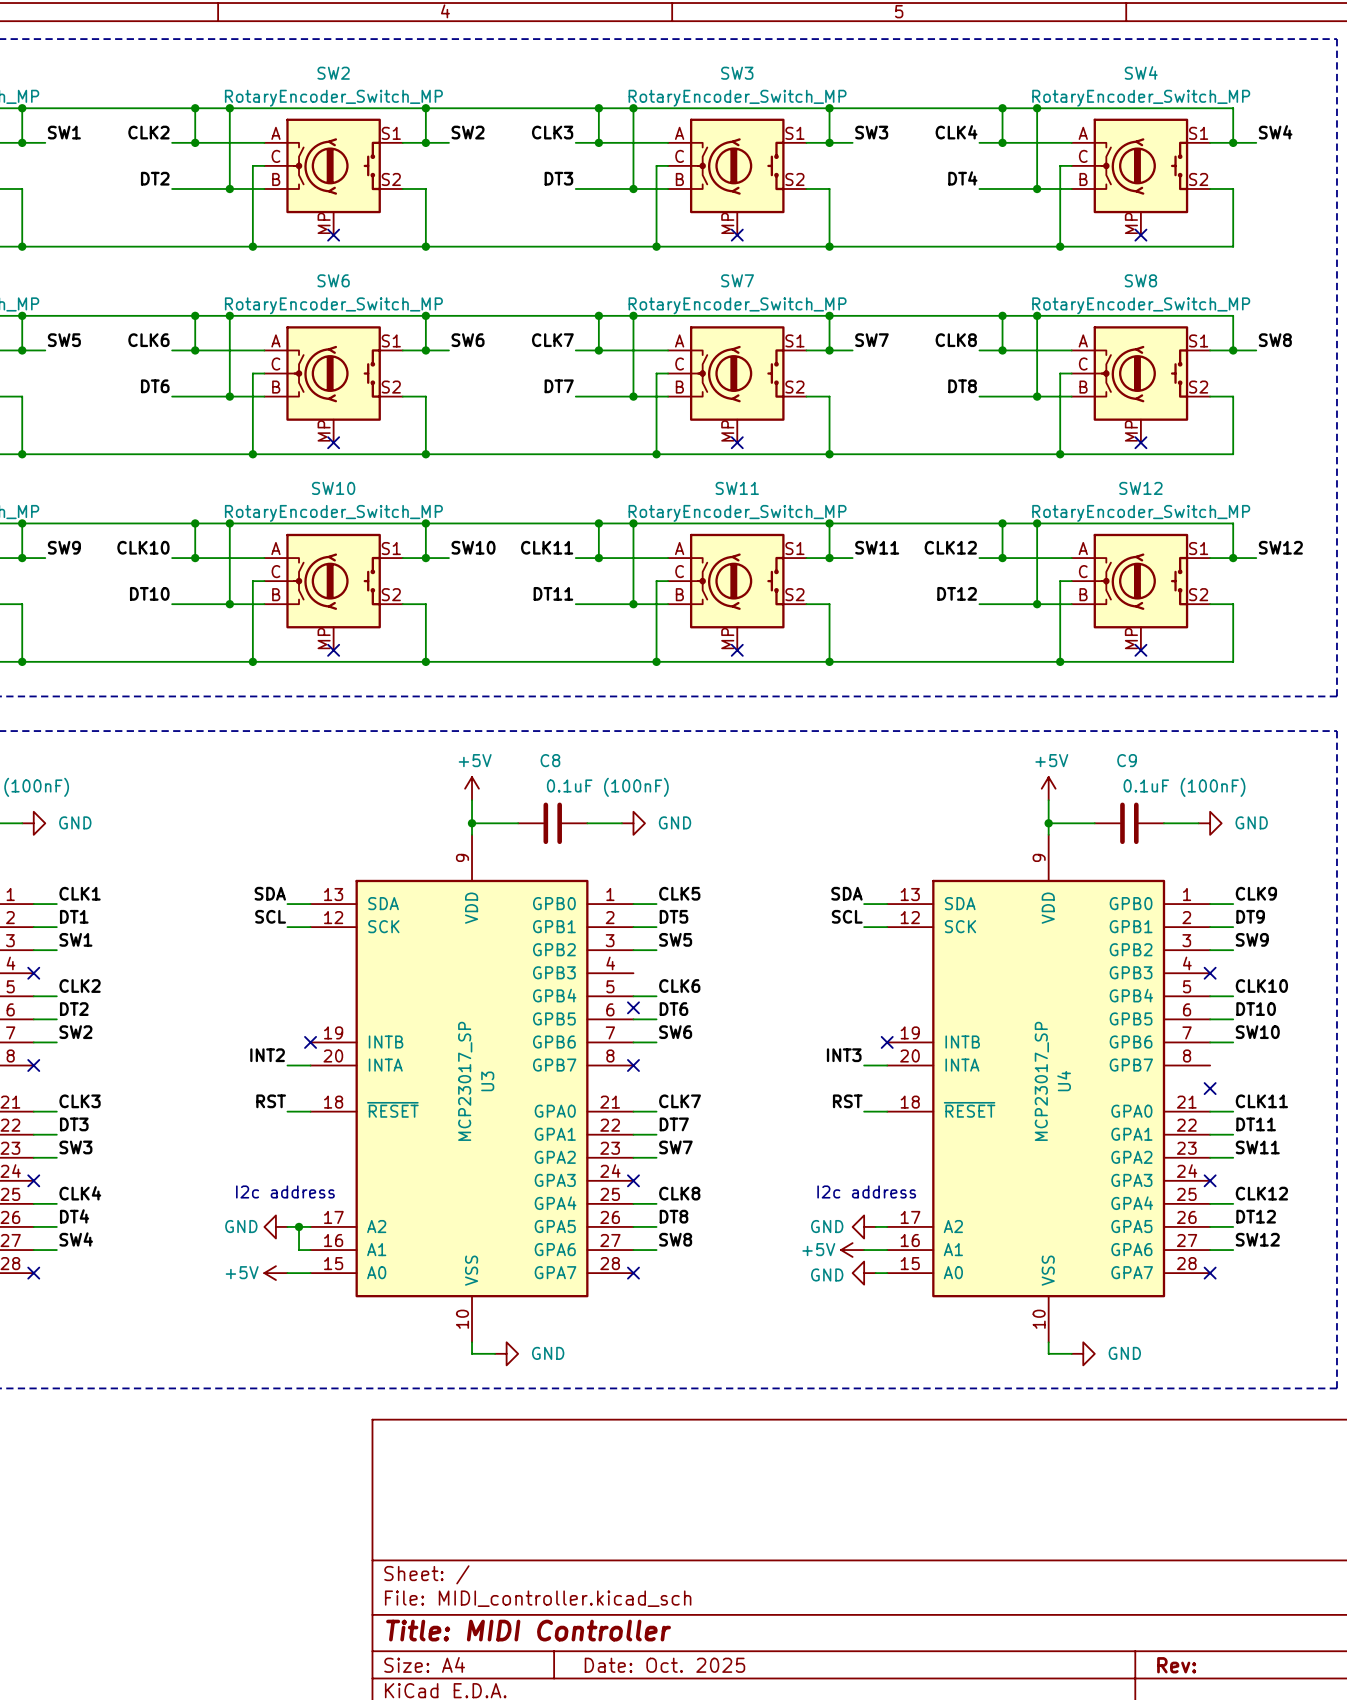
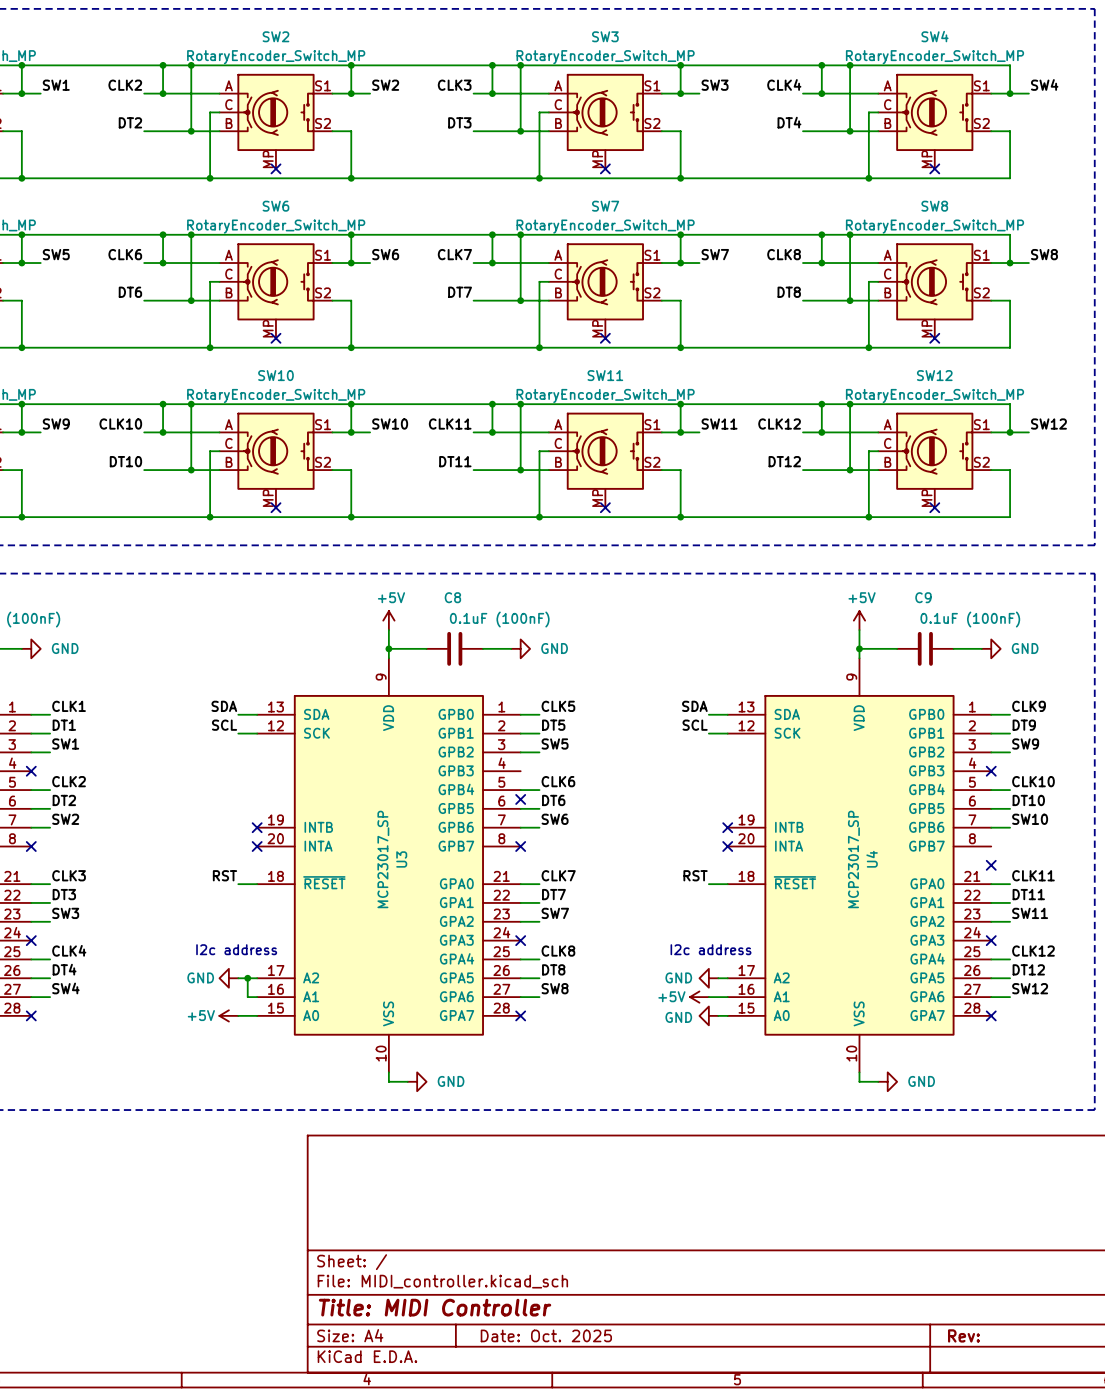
label: INT2 (267, 1055) -> none
label: INT3 (844, 1055) -> none
wire: (287, 1065) (310, 1065) -> none
no-connect mark: none -> (257, 846)
wire: (864, 1065) (887, 1065) -> none
no-connect mark: none -> (727, 846)

